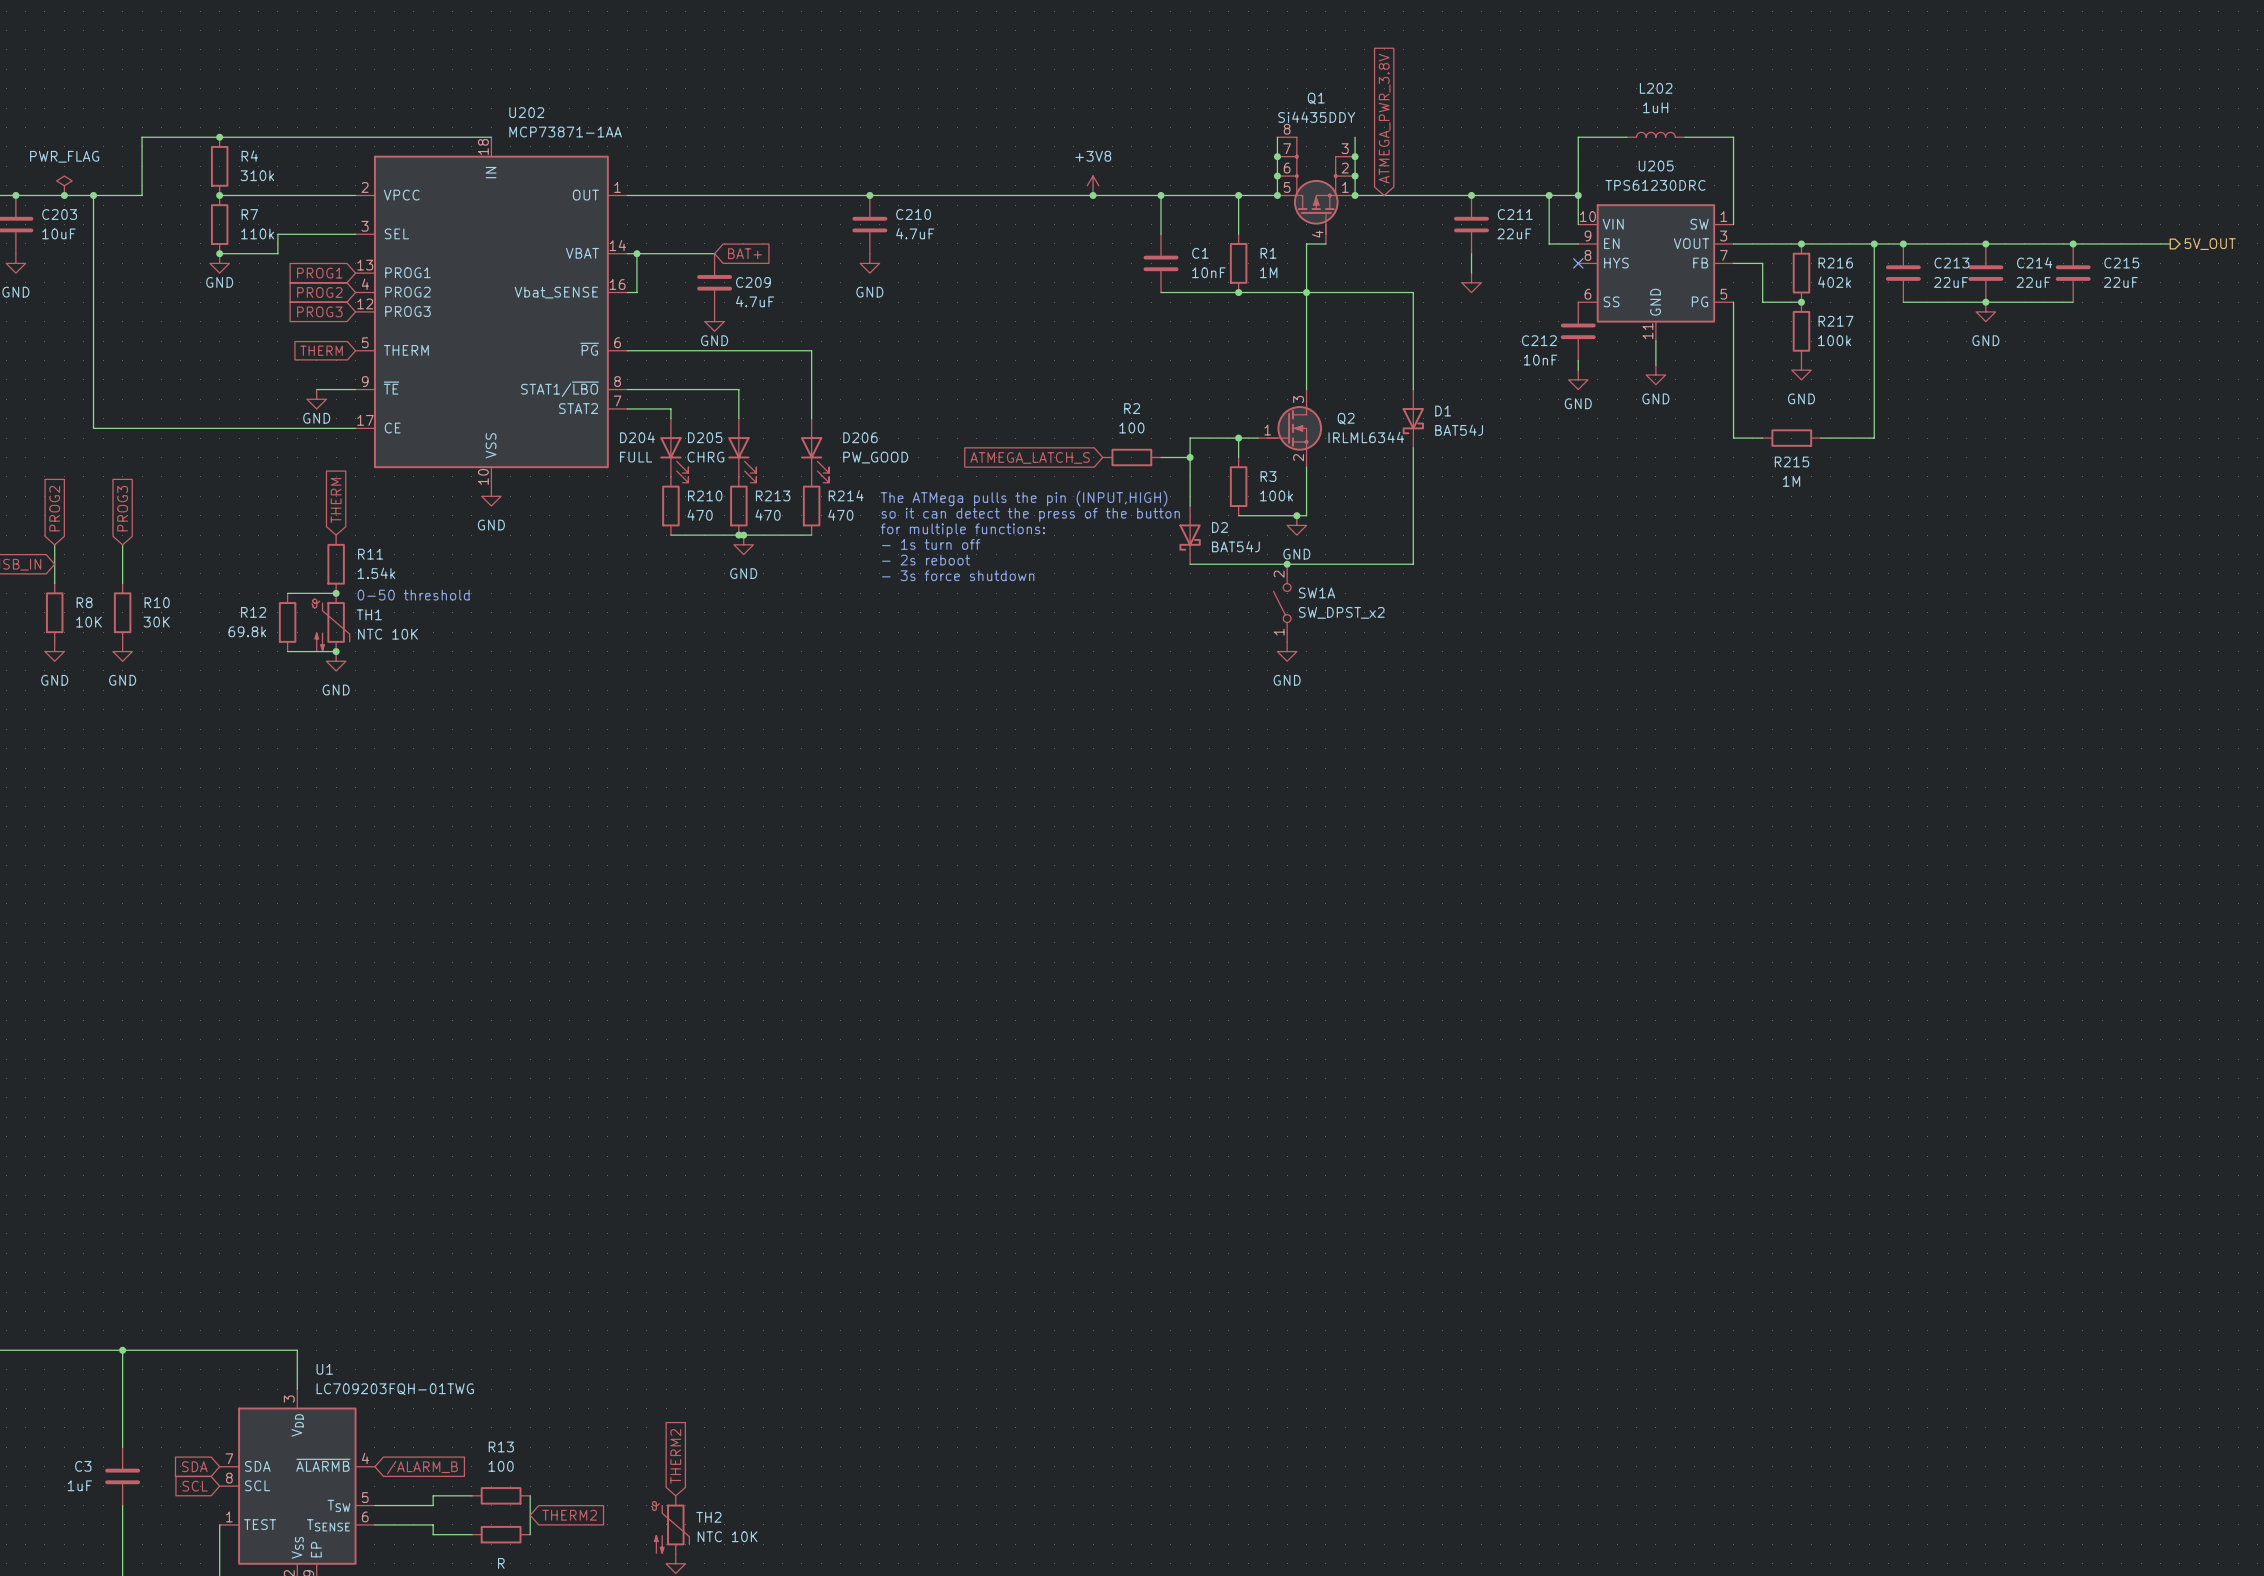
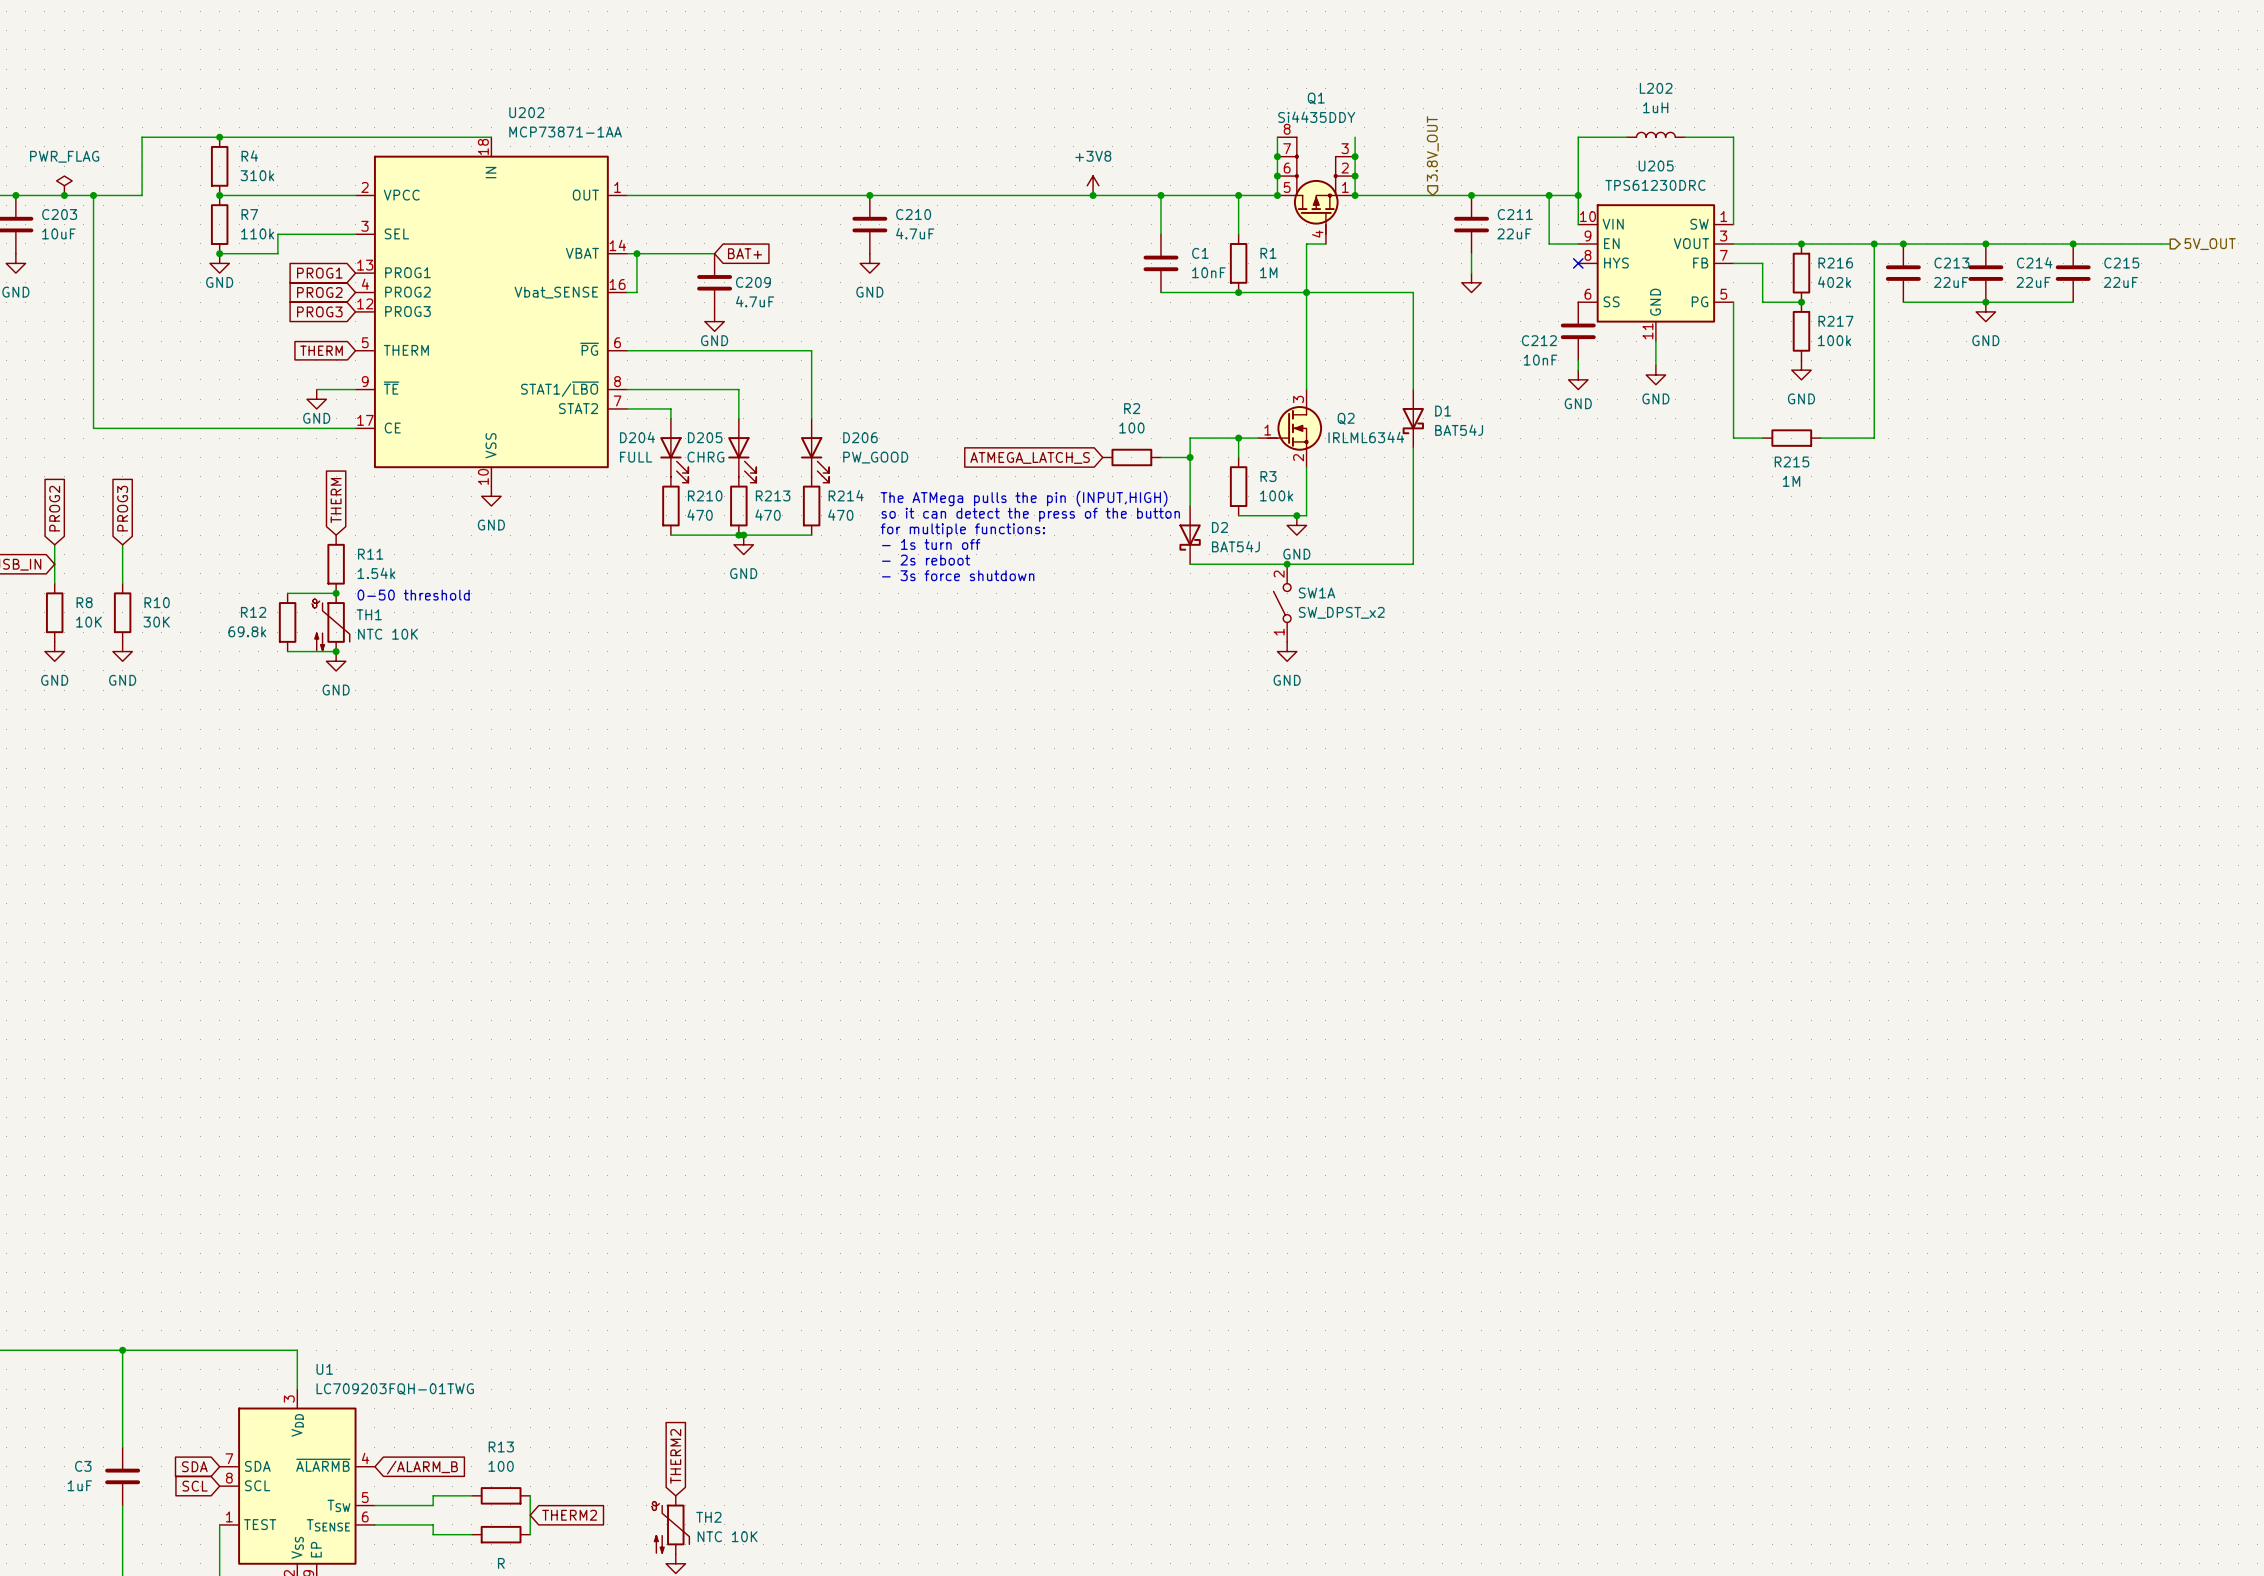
global label: ATMEGA_PWR_3.8V (1384, 118) -> none
hierarchical label: none -> 3.8V_OUT (1432, 148)

